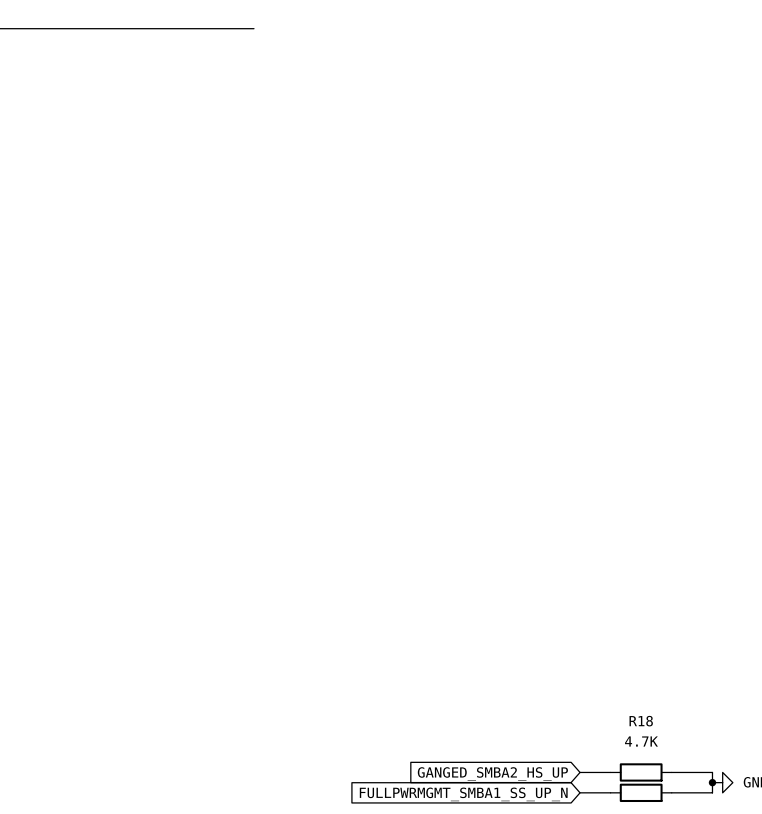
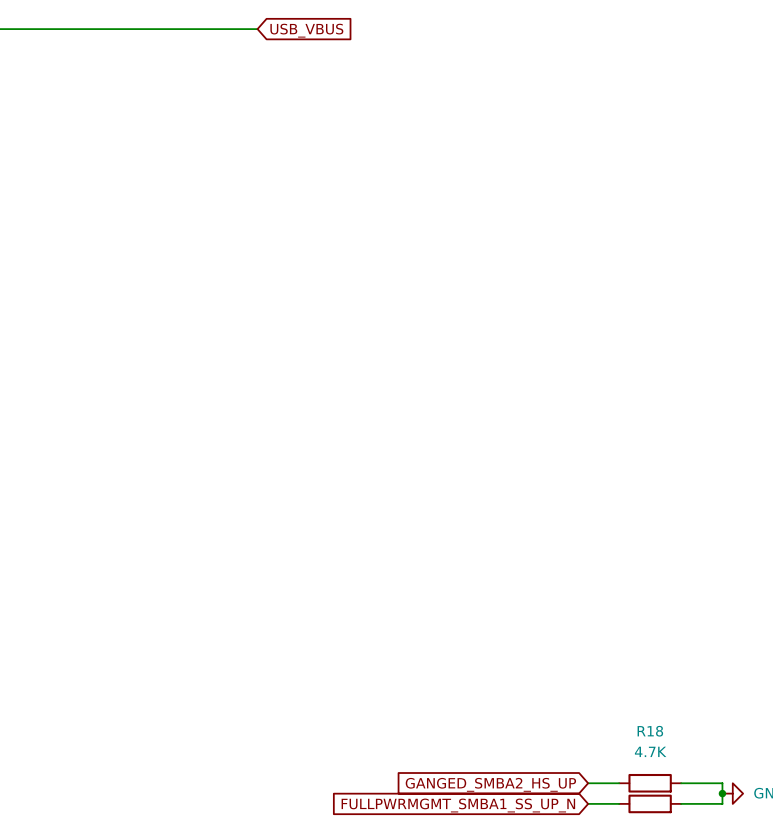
global label: none -> USB_VBUS (306, 30)

